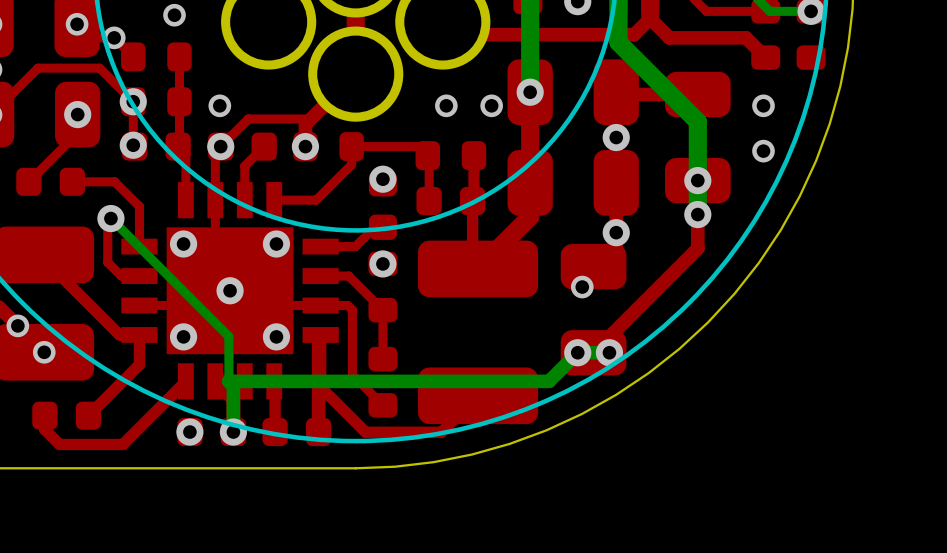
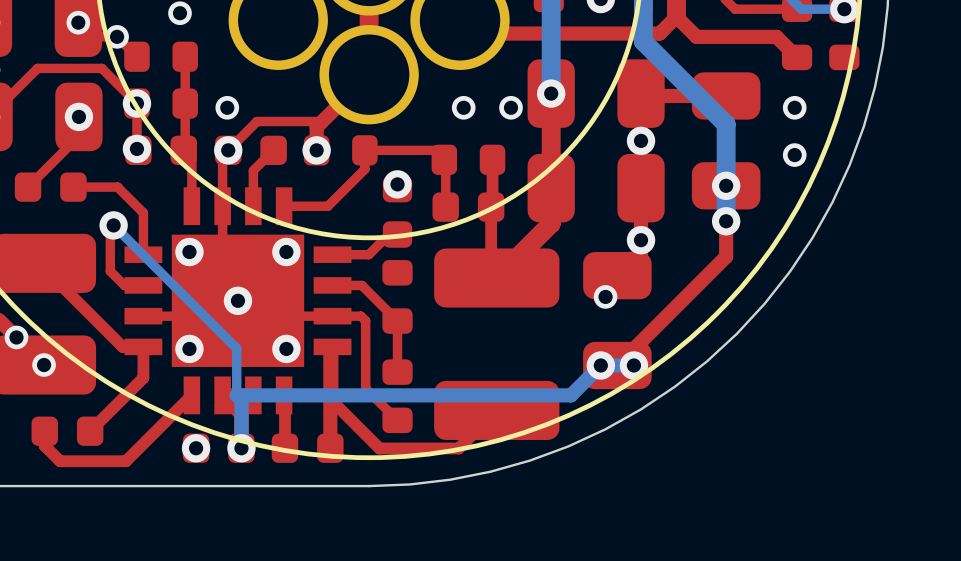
via: (382, 263) -> none

